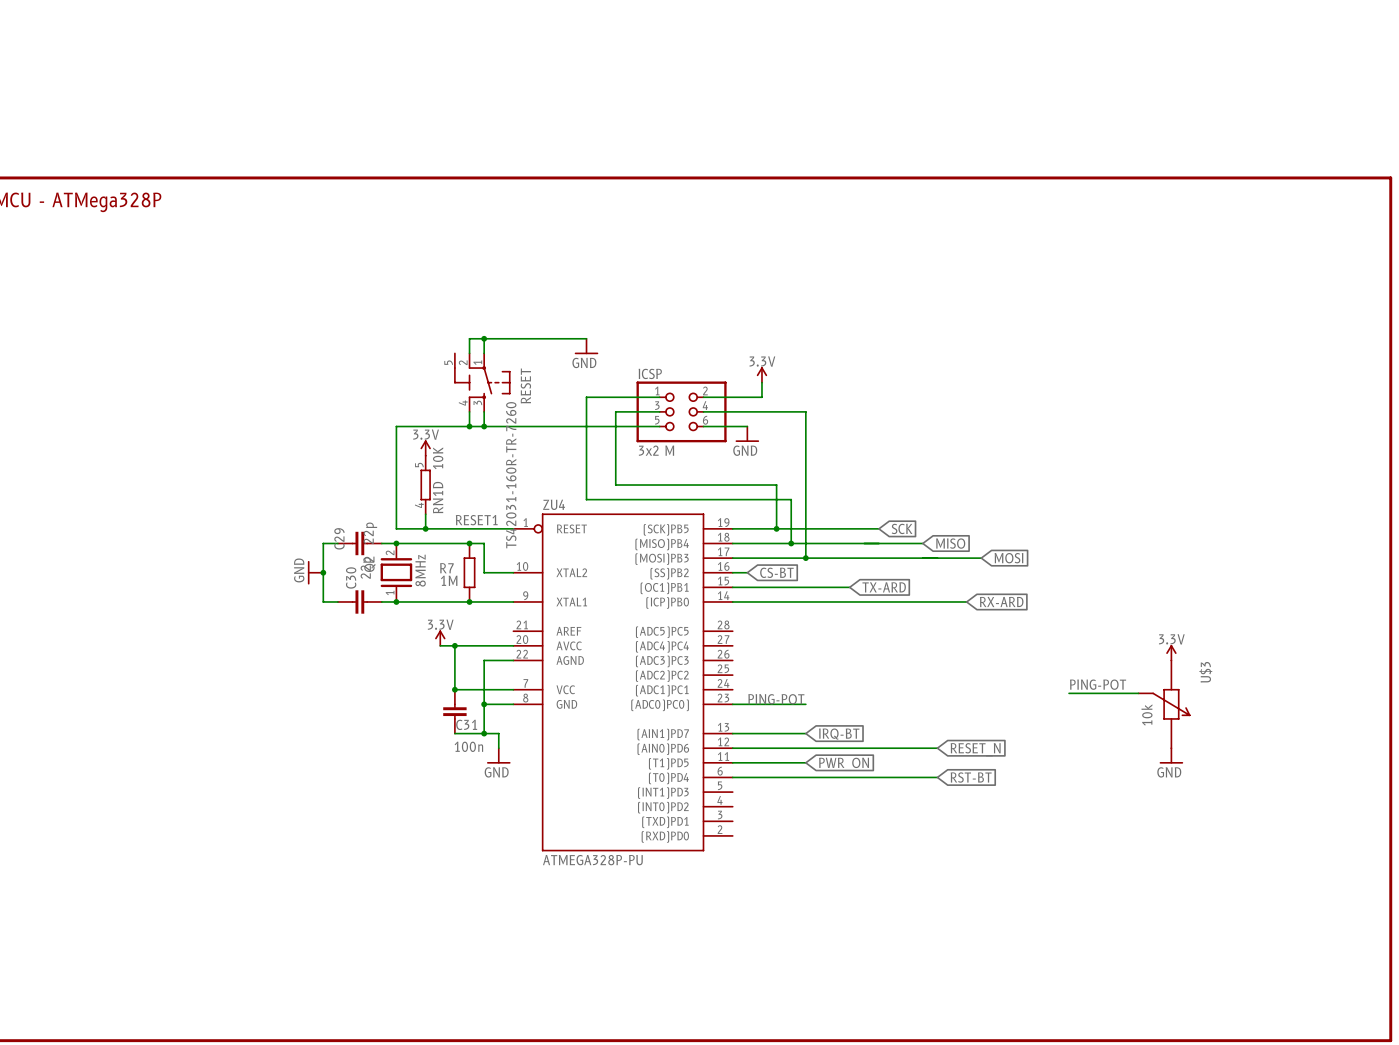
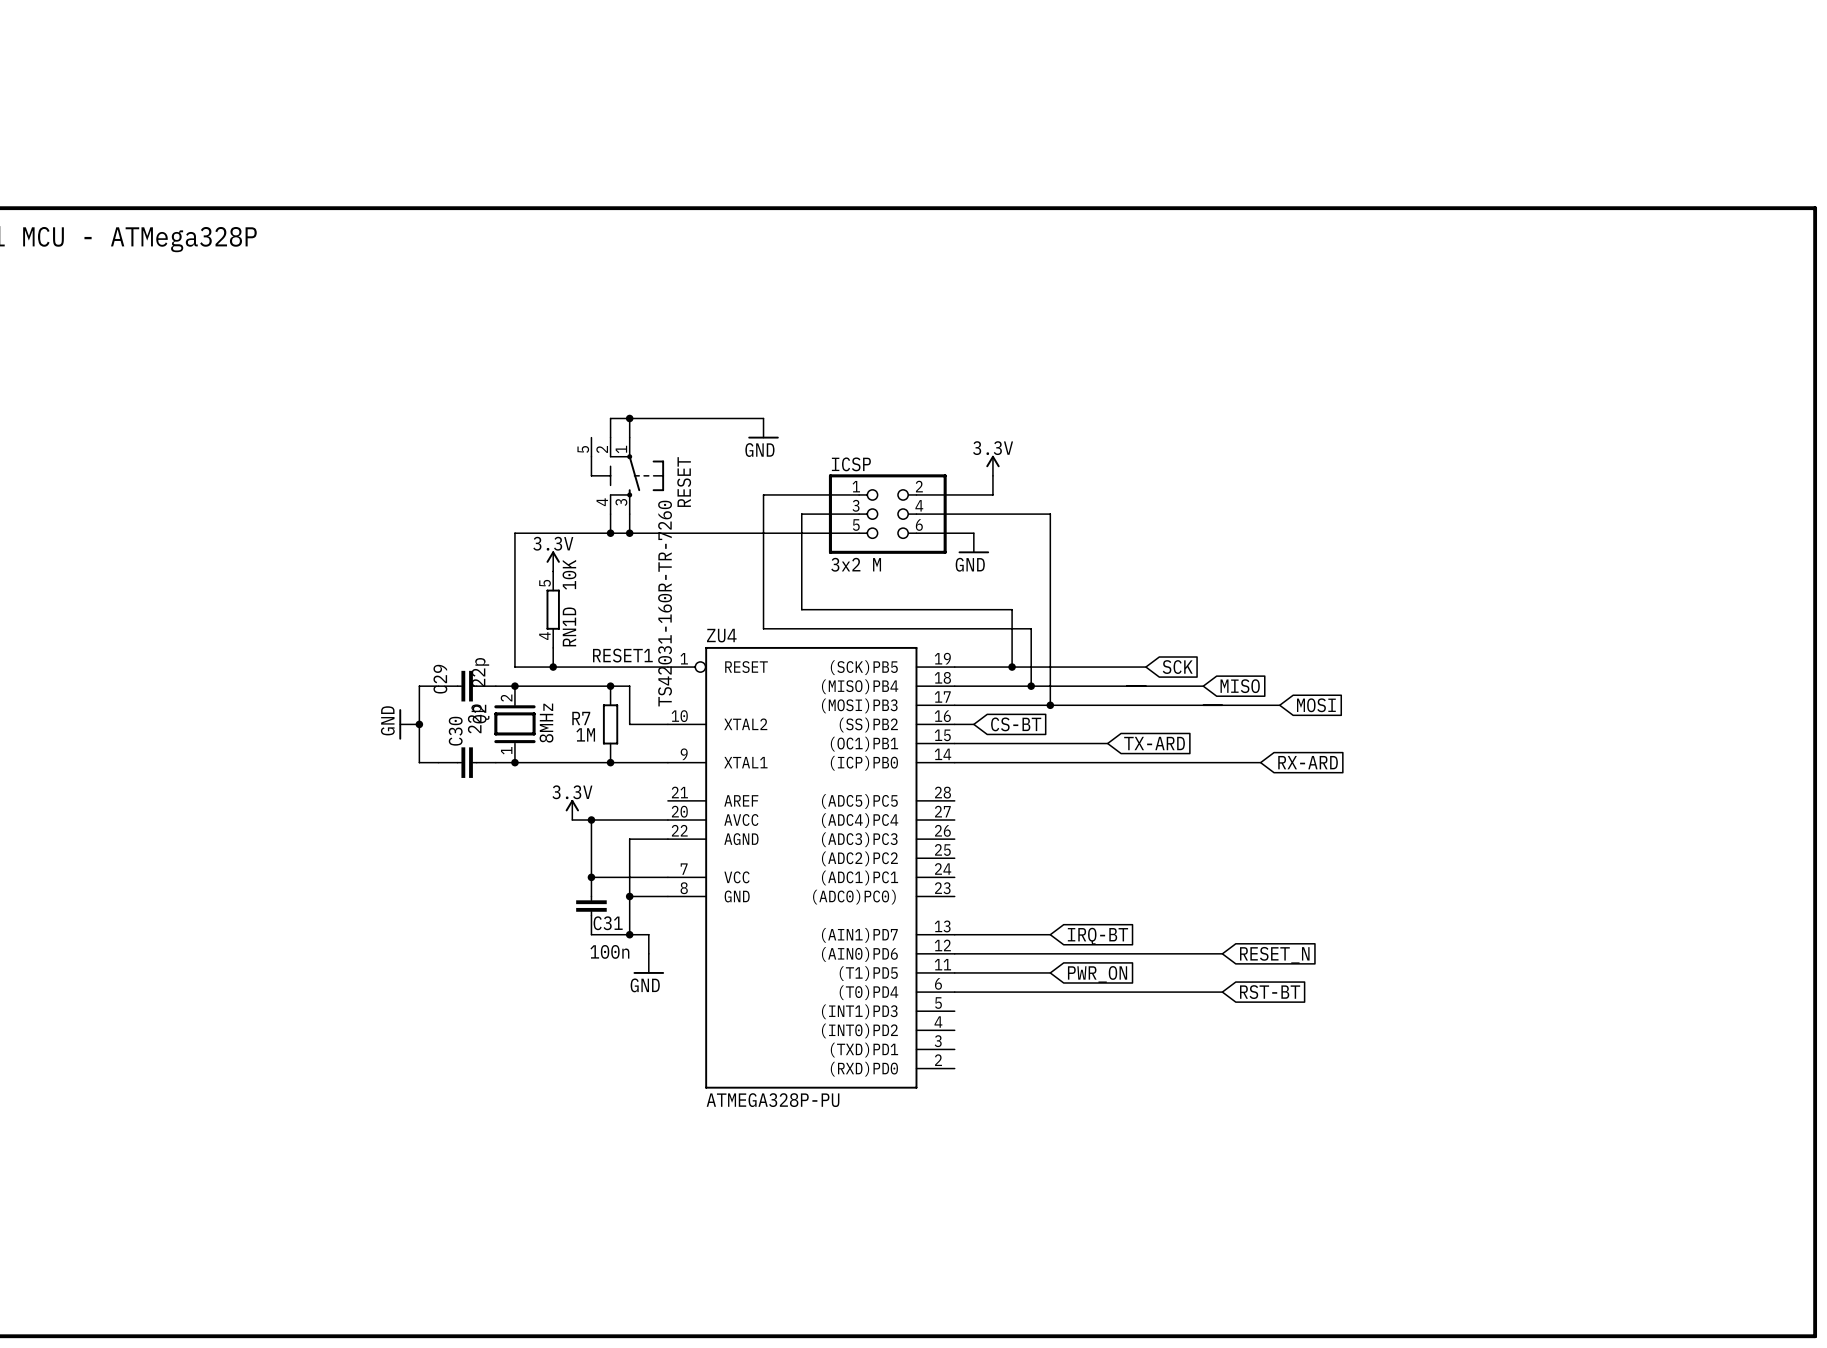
power symbol: 3.3V (1171, 652) -> none
label: PING-POT (1098, 684) -> none
wire: (1069, 693) (1138, 693) -> none
label: PING-POT (776, 699) -> none
wire: (732, 704) (805, 704) -> none
U$3: 10k (1164, 704) -> none
power symbol: GND (1171, 755) -> none

